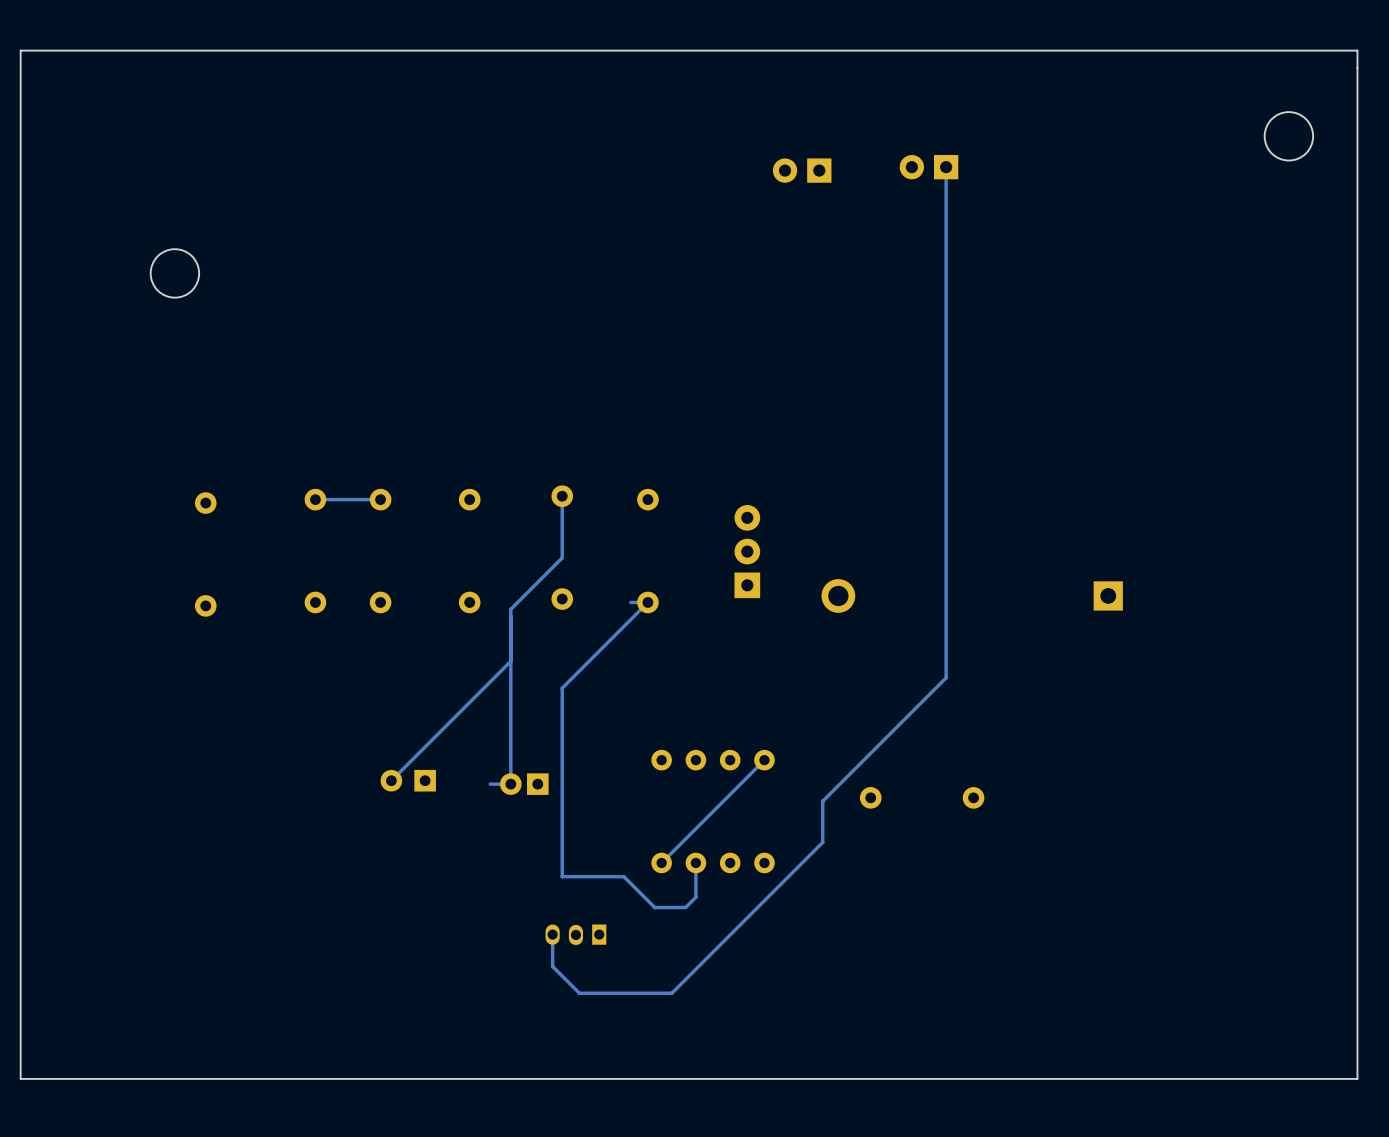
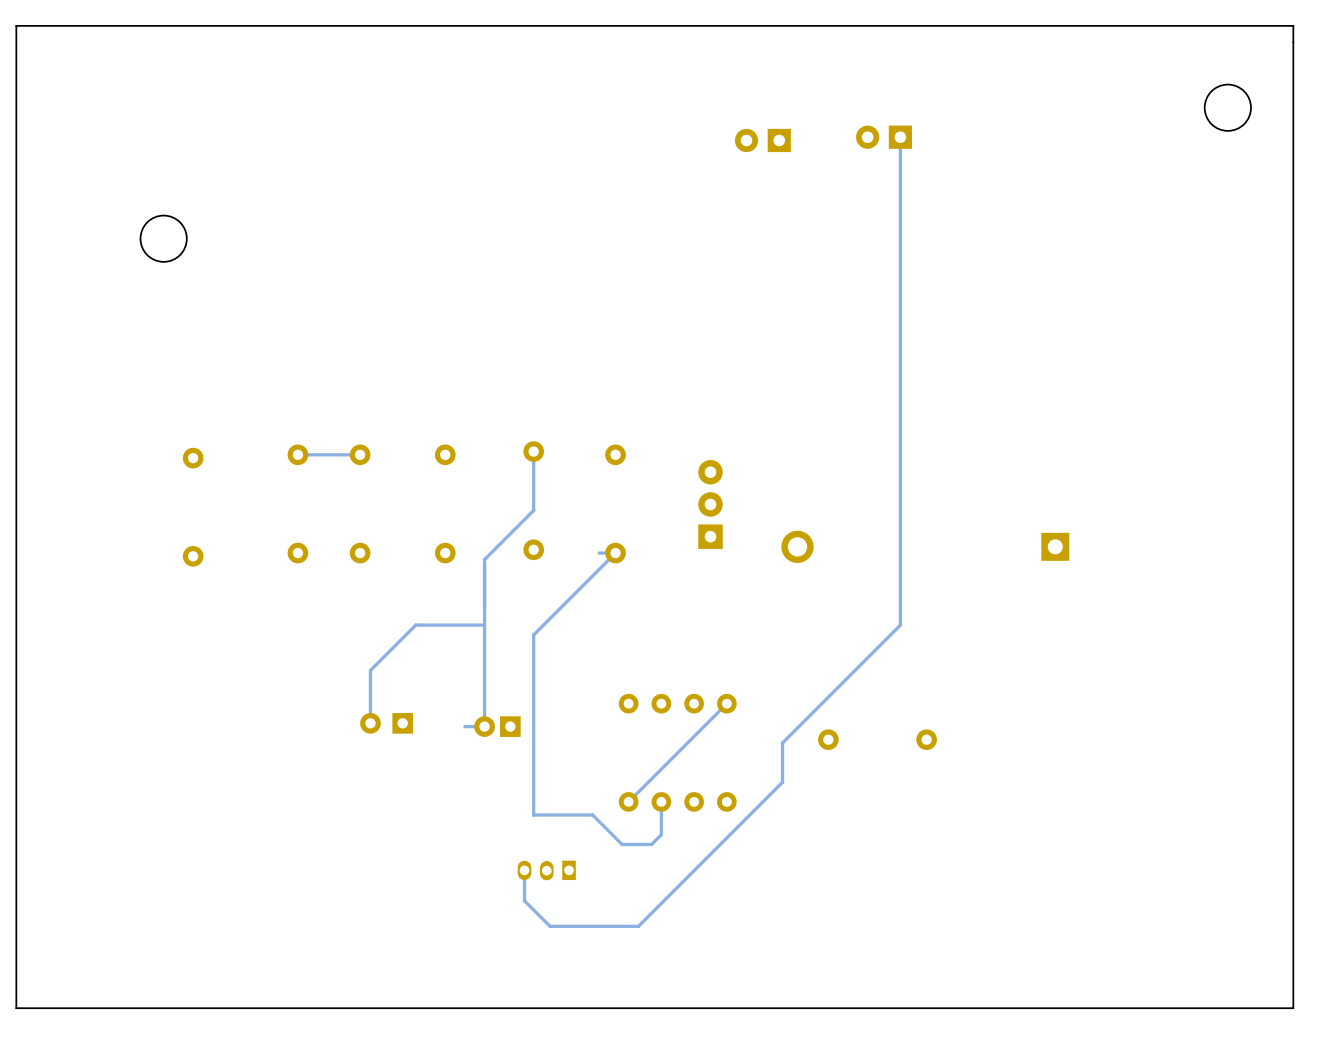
track: (510, 661) (391, 780) -> (484, 625) (415, 625) (370, 670) (370, 723)

